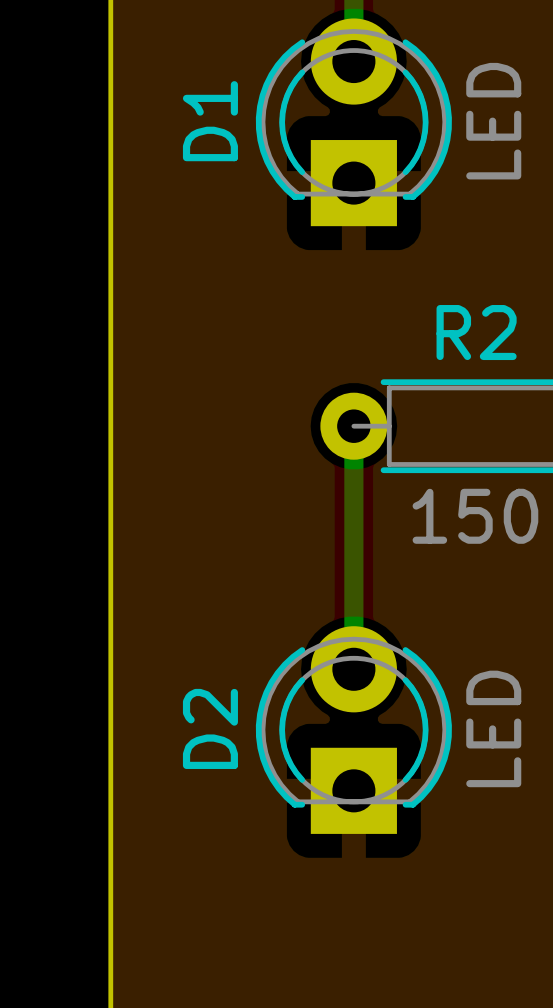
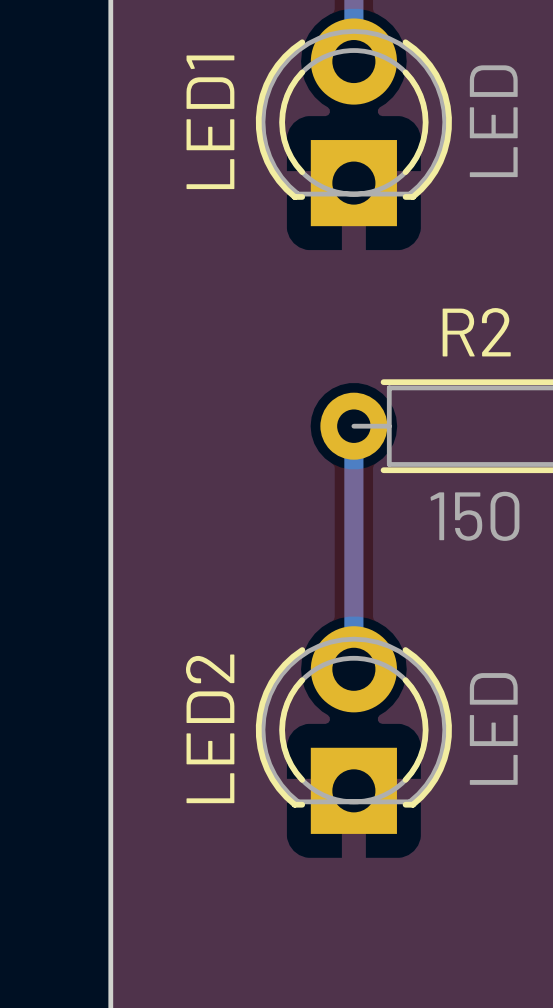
D1 name: D1 (210, 121) -> LED1 (210, 122)
D2 name: D2 (210, 728) -> LED2 (210, 728)

